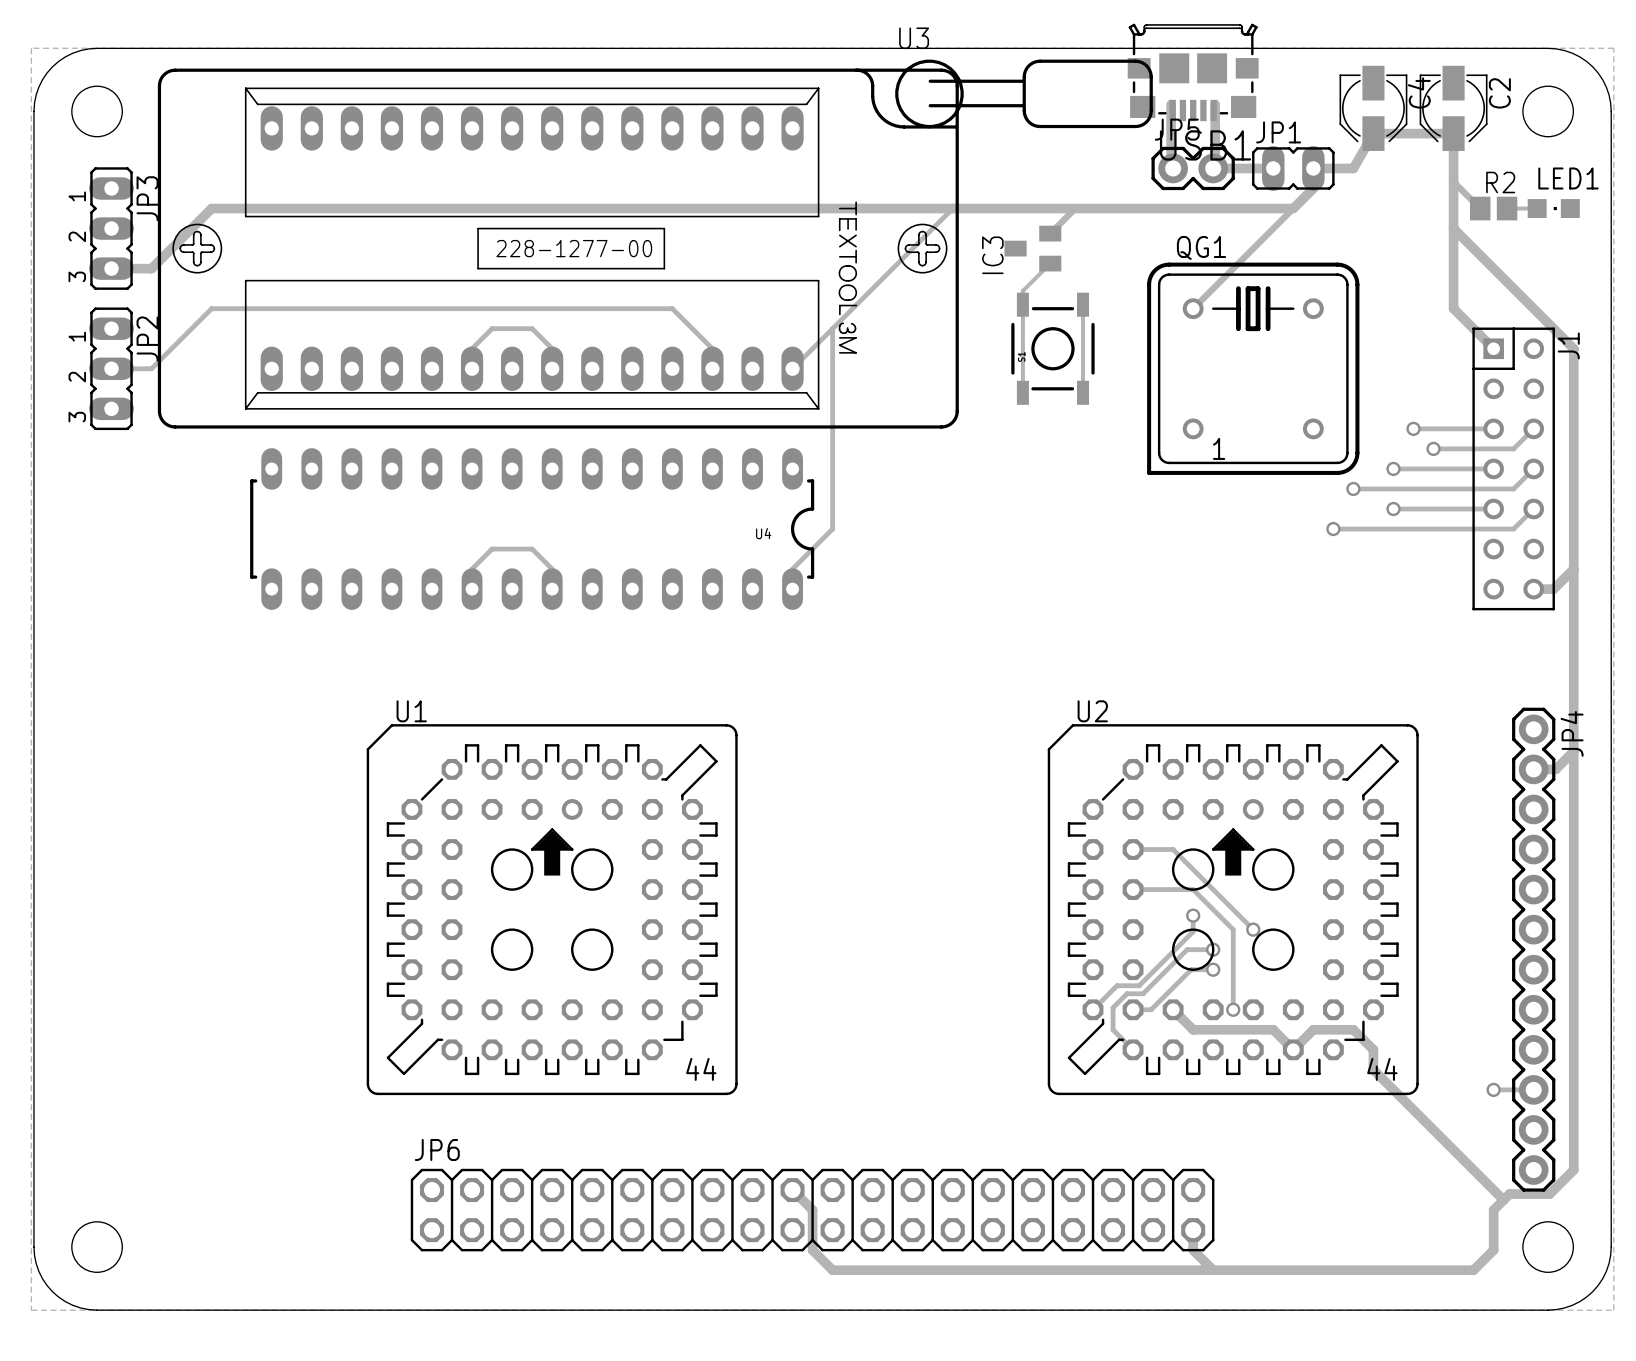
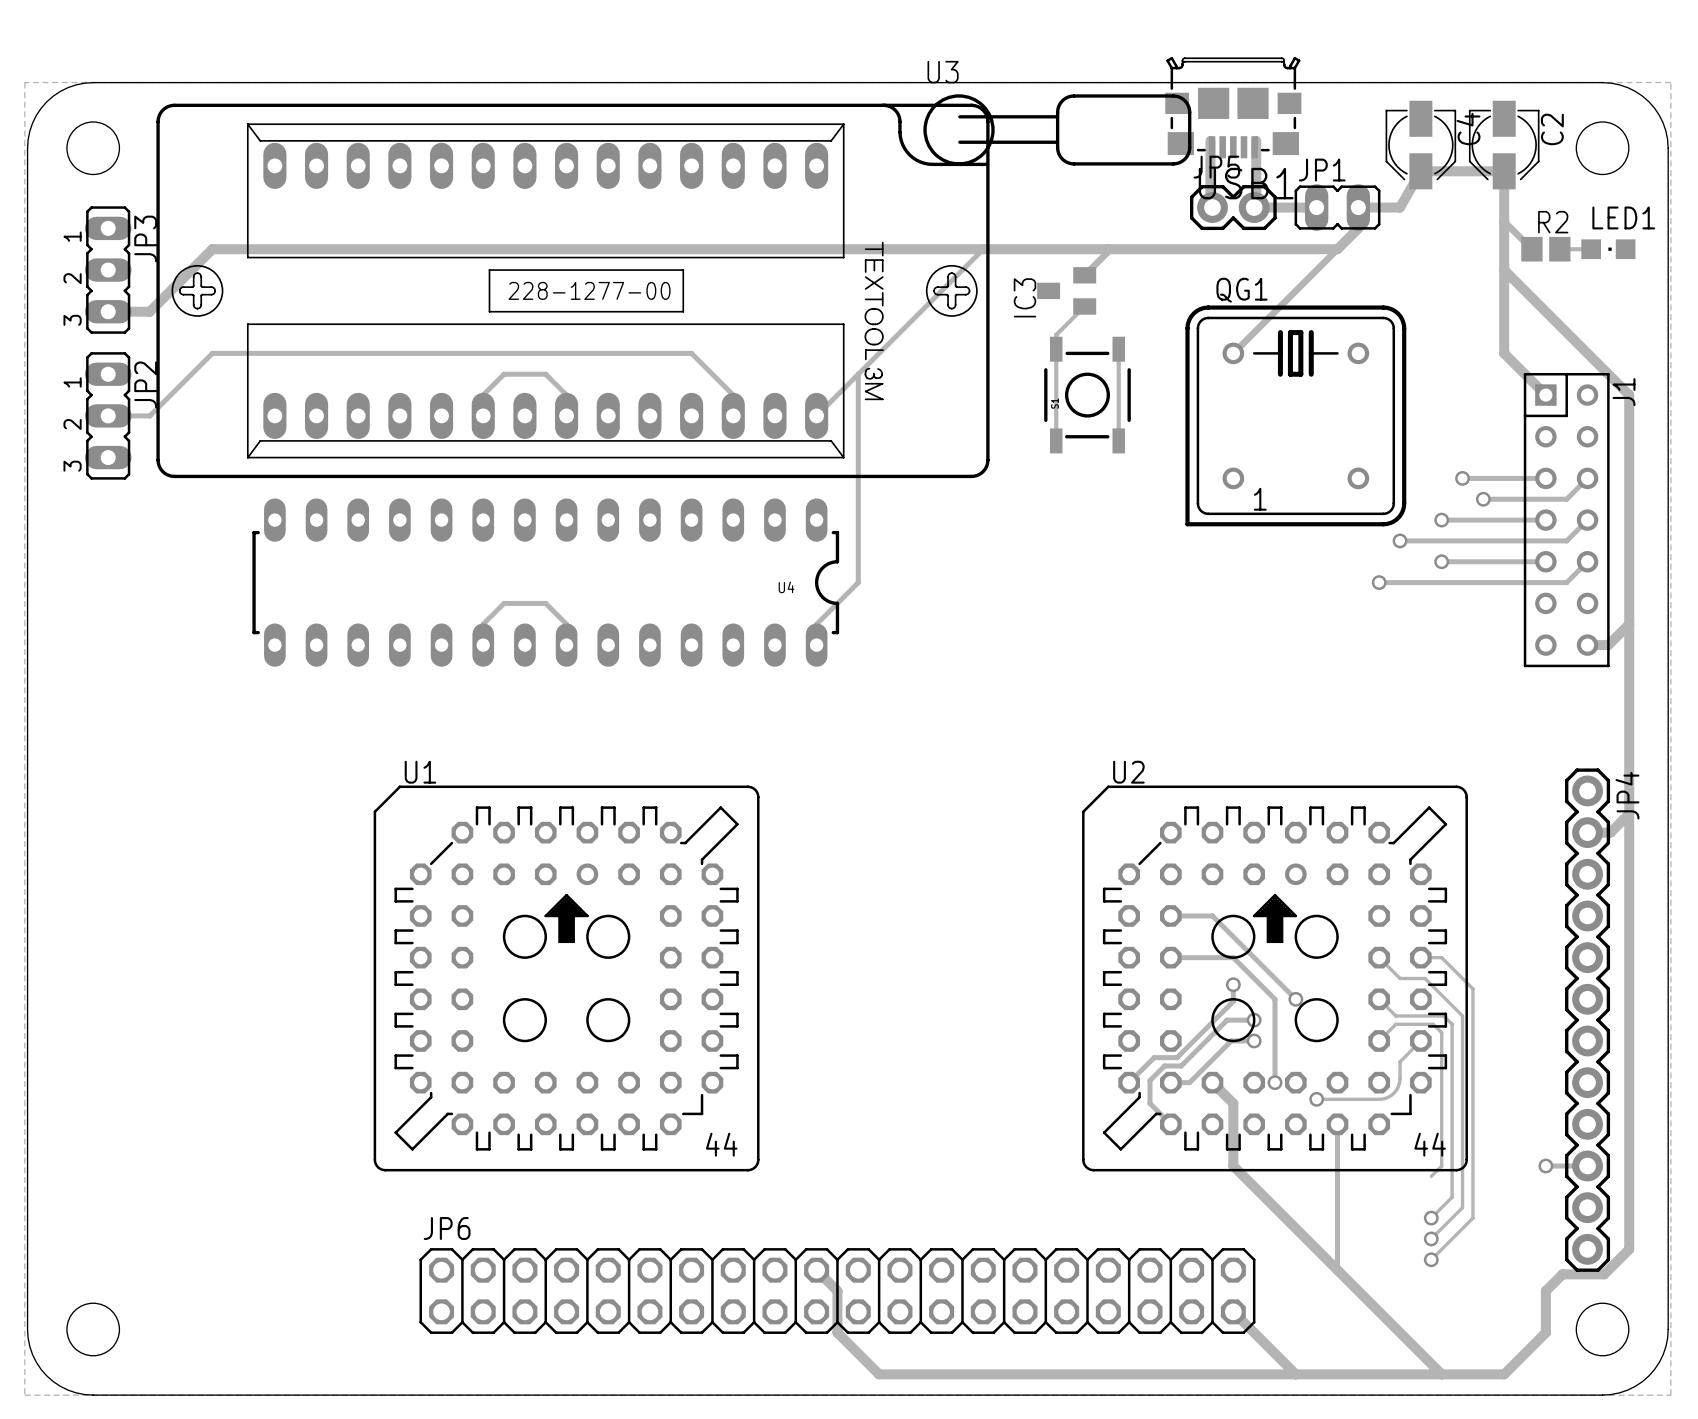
track: none -> (1379, 957) (1400, 978) (1425, 978) (1462, 1015) (1462, 1207) (1431, 1238)
track: none -> (1420, 957) (1441, 957) (1472, 988) (1472, 1218) (1431, 1259)
track: none -> (1379, 999) (1395, 1015) (1443, 1015) (1452, 1024) (1452, 1197) (1431, 1218)
track: none -> (1379, 1040) (1395, 1024) (1433, 1024) (1441, 1032) (1441, 1166) (1431, 1176)
track: none -> (1420, 1040) (1400, 1061) (1399, 1083) (1395, 1091) (1389, 1096) (1379, 1099) (1316, 1099)
via: none -> (1316, 1099)
track: (1193, 1029) (1273, 1029) (1293, 1049) (1313, 1029) (1353, 1029) (1373, 1049) (1373, 1069) (1503, 1200) -> (1233, 1103) (1233, 1166) (1441, 1374)
track: none -> (1337, 1124) (1337, 1270)
via: none -> (1431, 1218)
via: none -> (1431, 1238)
via: none -> (1431, 1259)
track: (1193, 1230) (1193, 1250) (1213, 1270) -> (1233, 1311) (1295, 1374)
track: (832, 1270) (1473, 1270) -> (858, 1353) (879, 1374) (1504, 1374) (1525, 1353)

